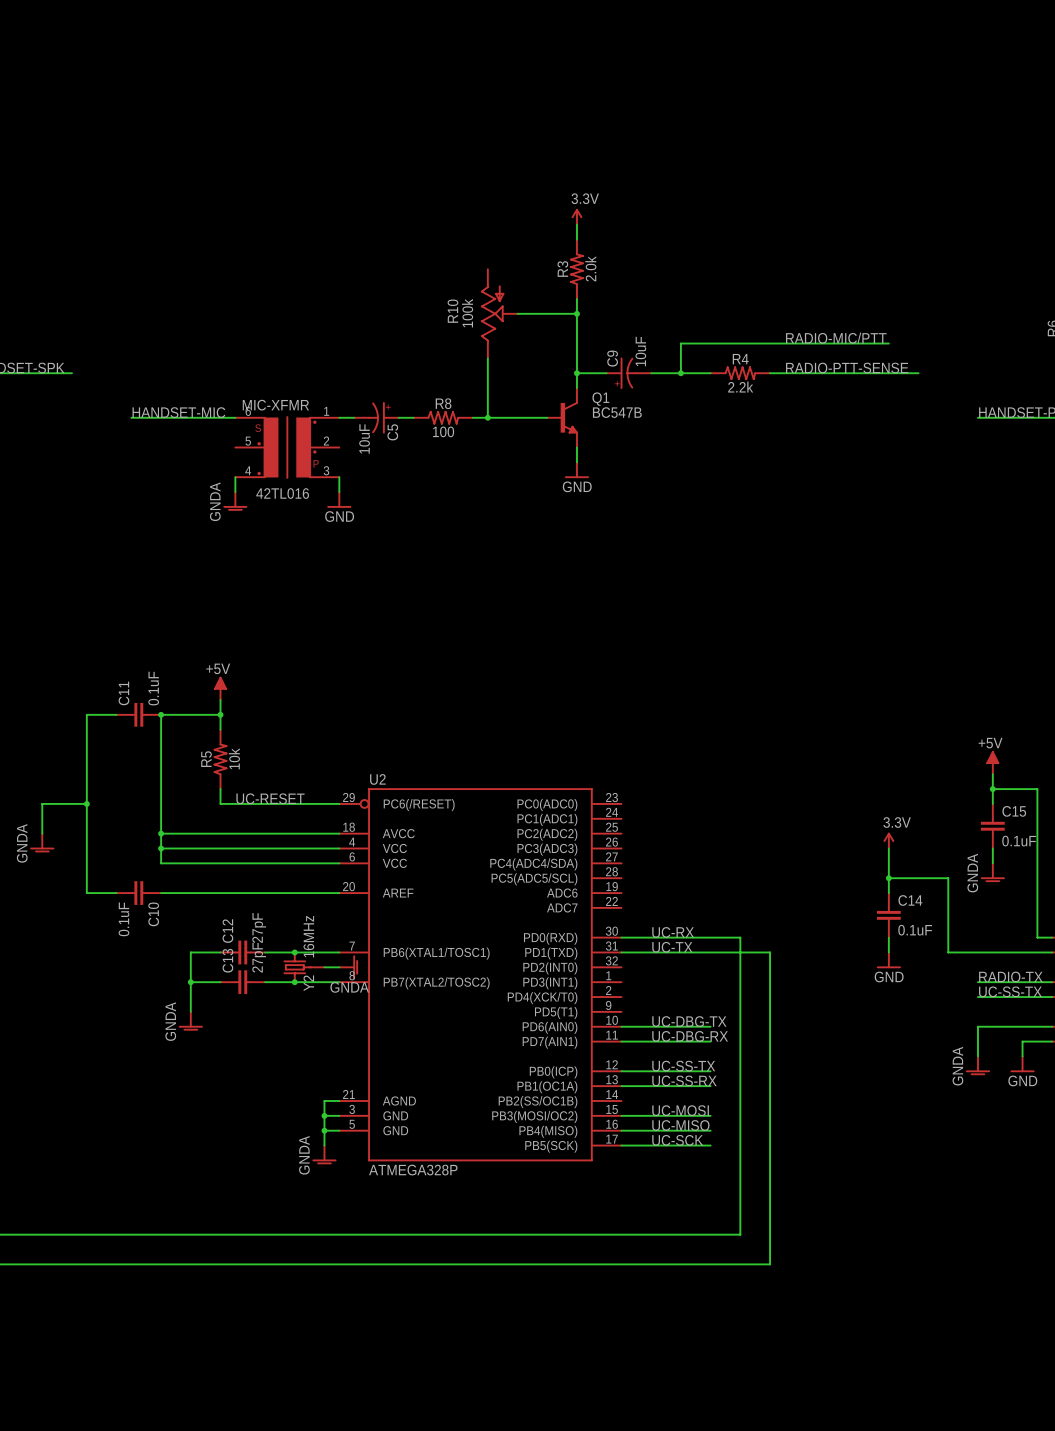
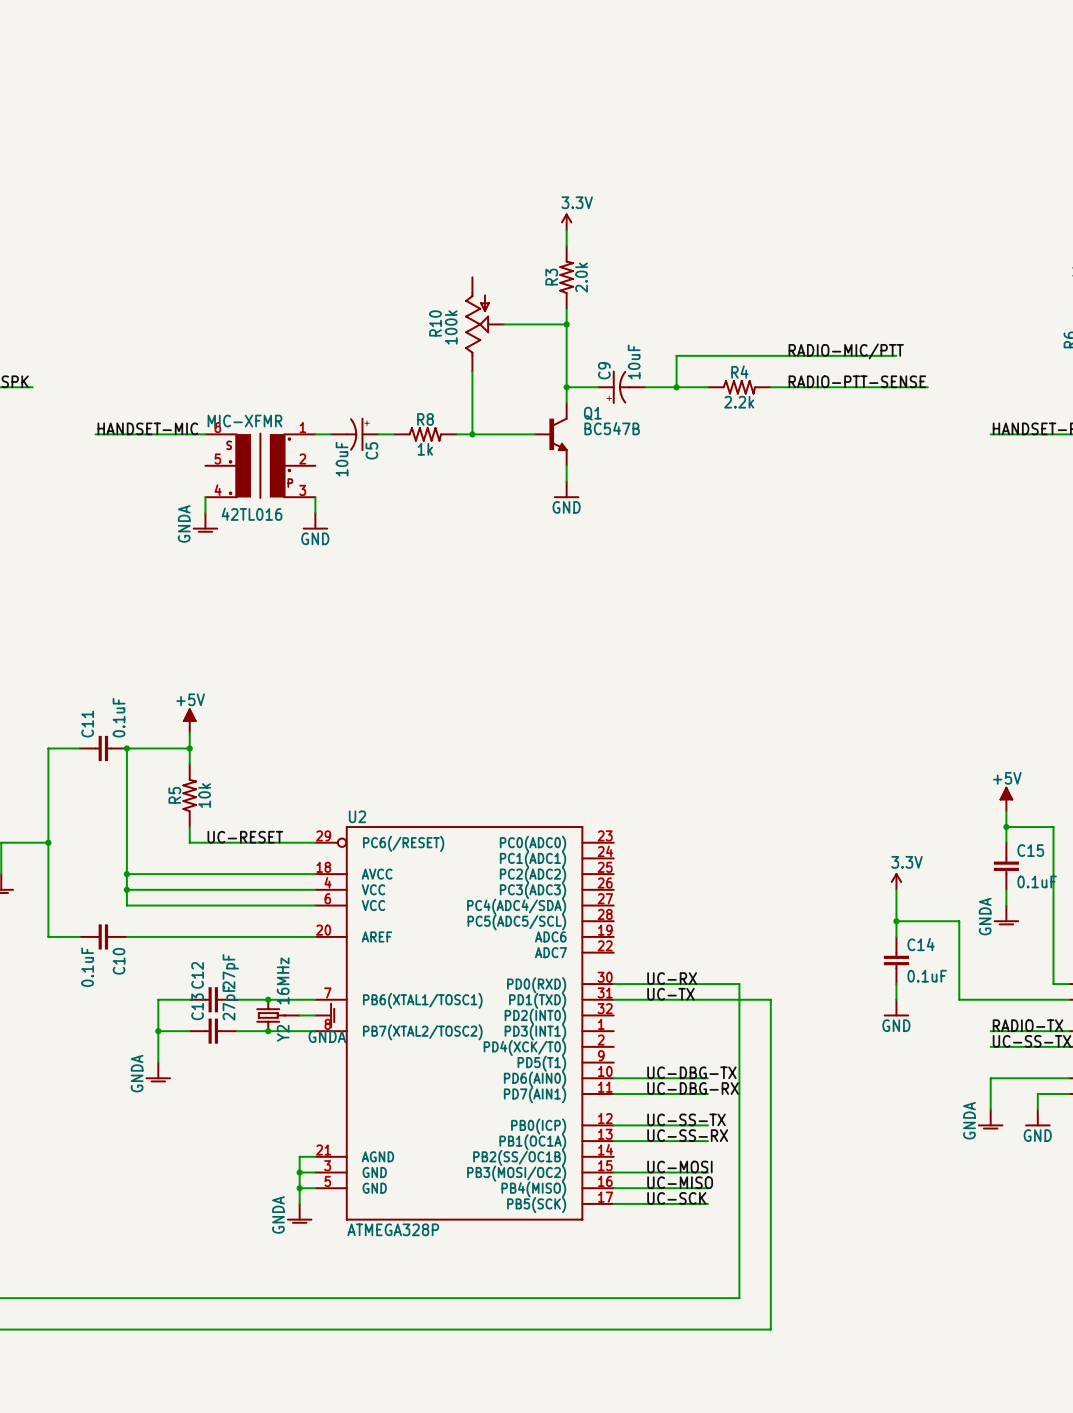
R8 value: 100 (443, 431) -> 1k (425, 449)

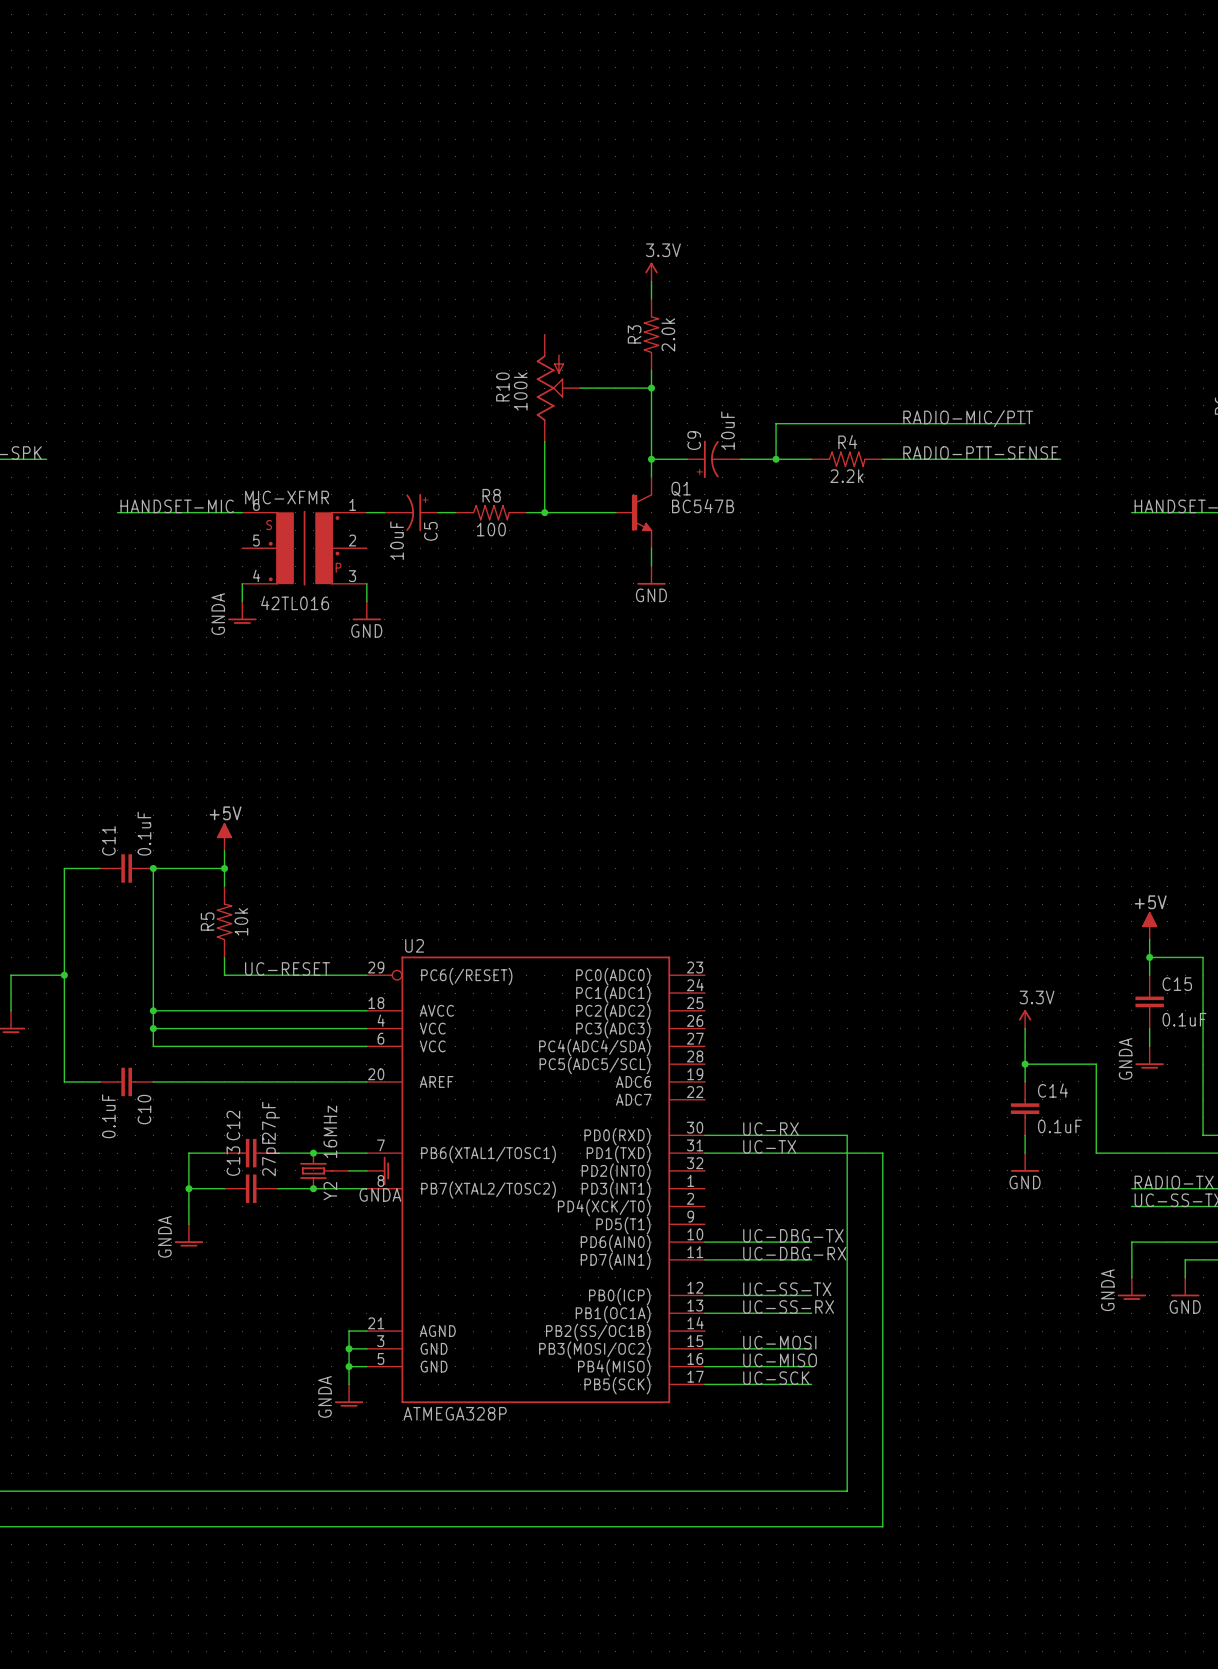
R8 value: 1k (425, 449) -> 100 (491, 529)

